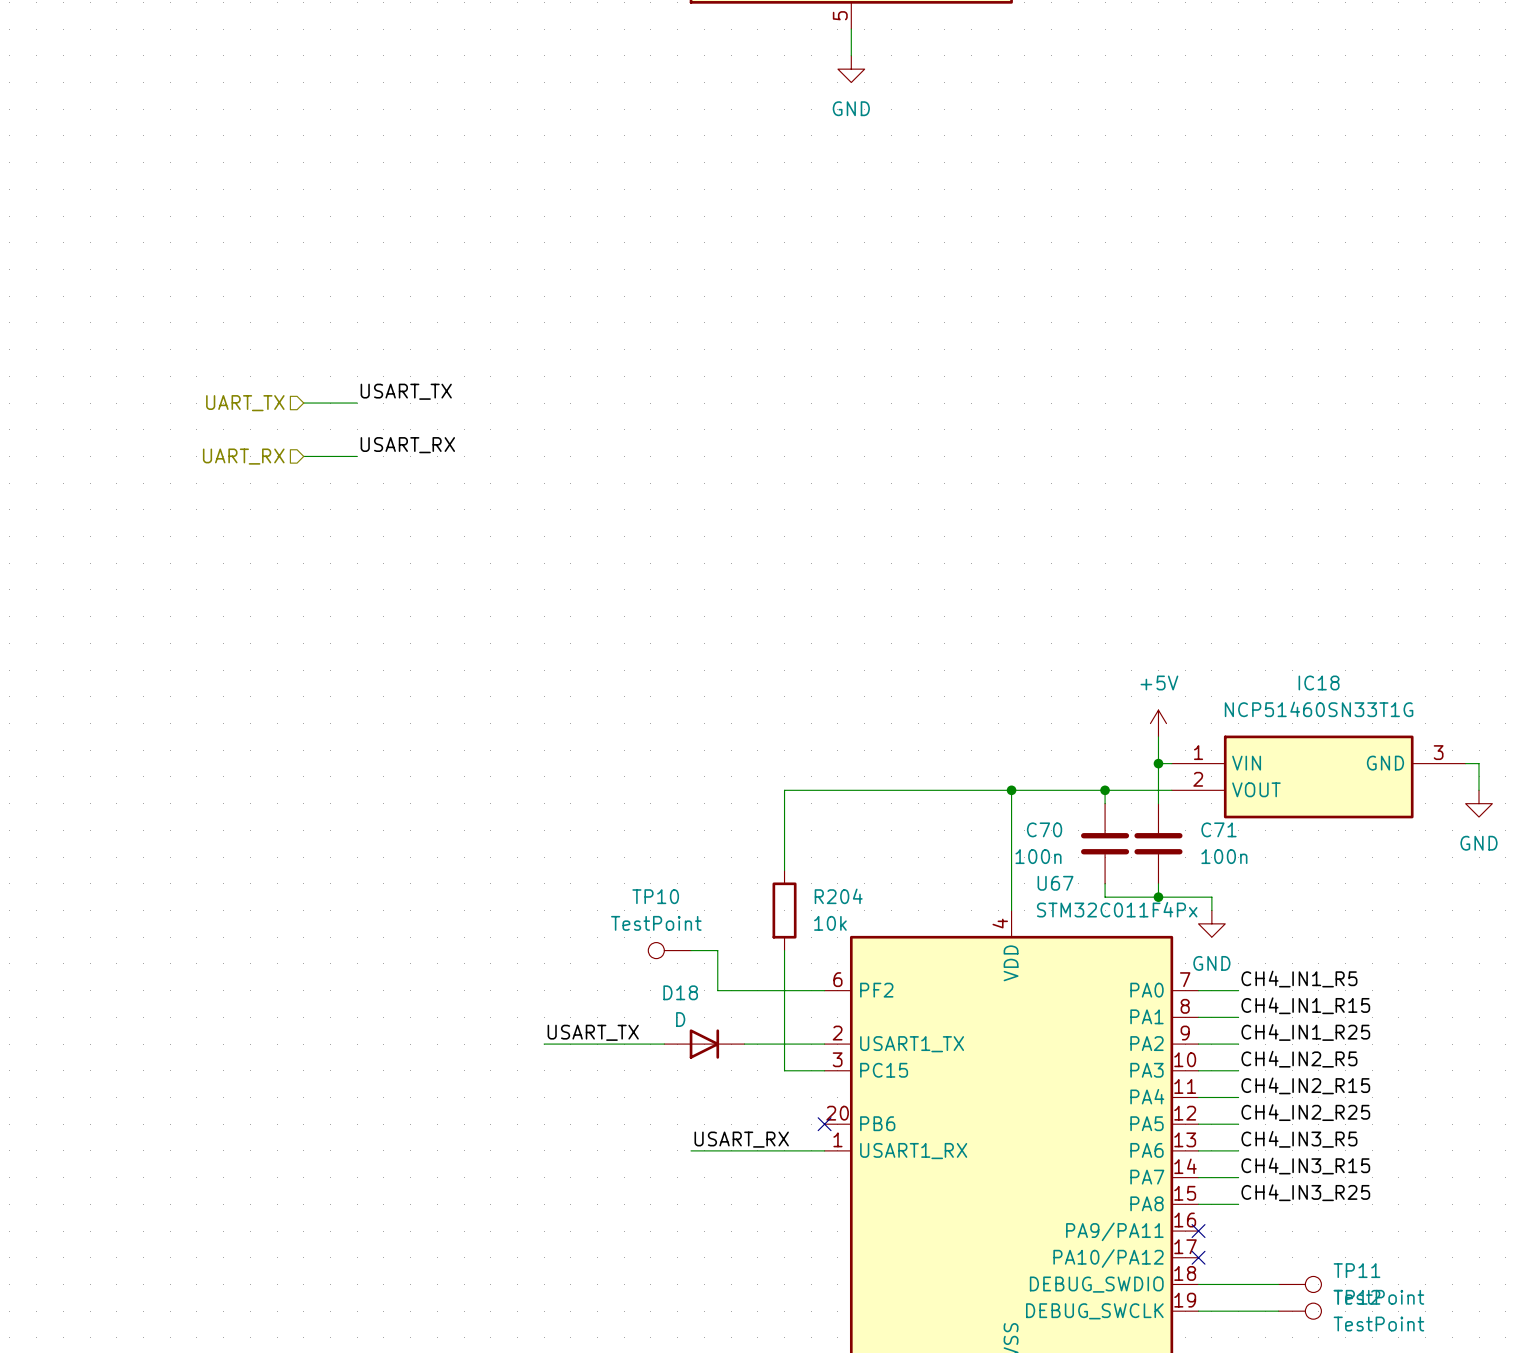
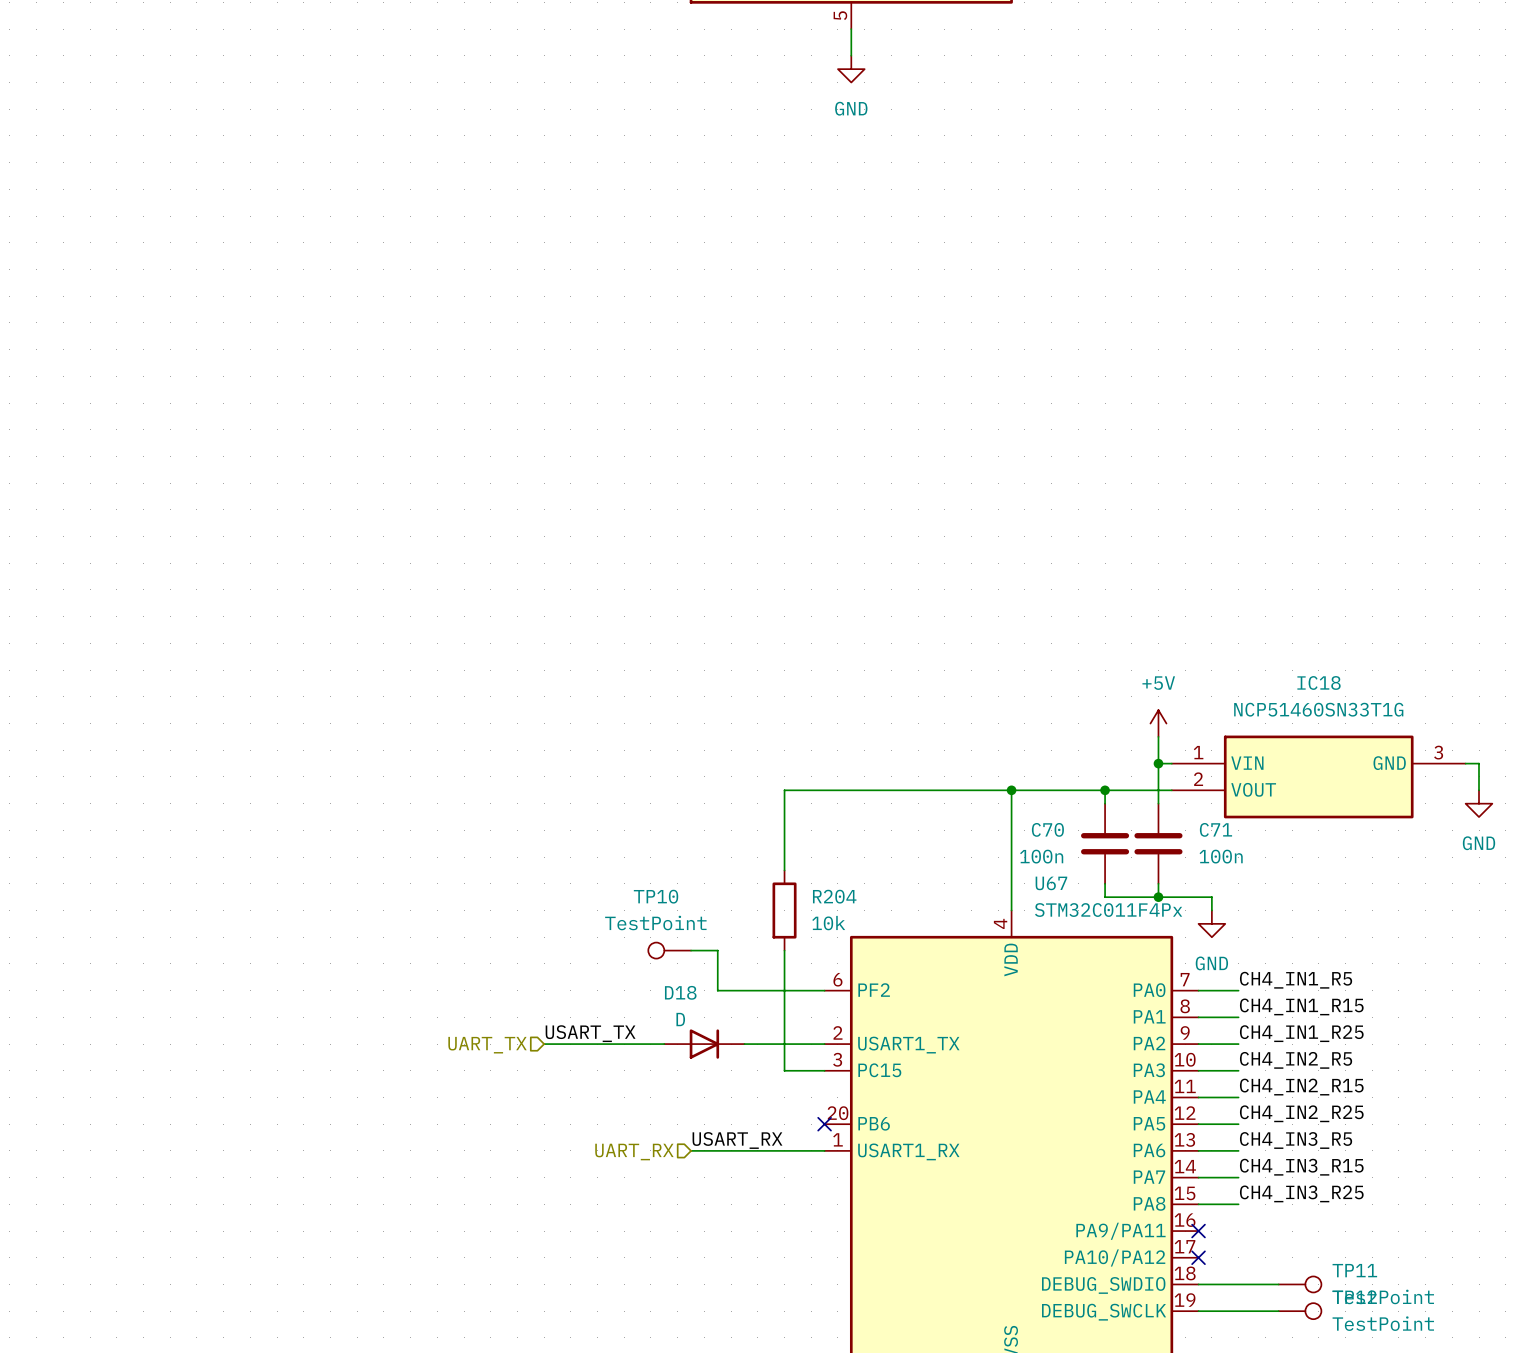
label: USART_TX (406, 391) -> none
hierarchical label: UART_TX (245, 403) -> none
wire: (303, 403) (357, 403) -> none
label: USART_RX (407, 445) -> none
hierarchical label: UART_RX (243, 456) -> none
wire: (303, 456) (357, 456) -> none
hierarchical label: none -> UART_TX (487, 1045)
hierarchical label: none -> UART_RX (634, 1152)

